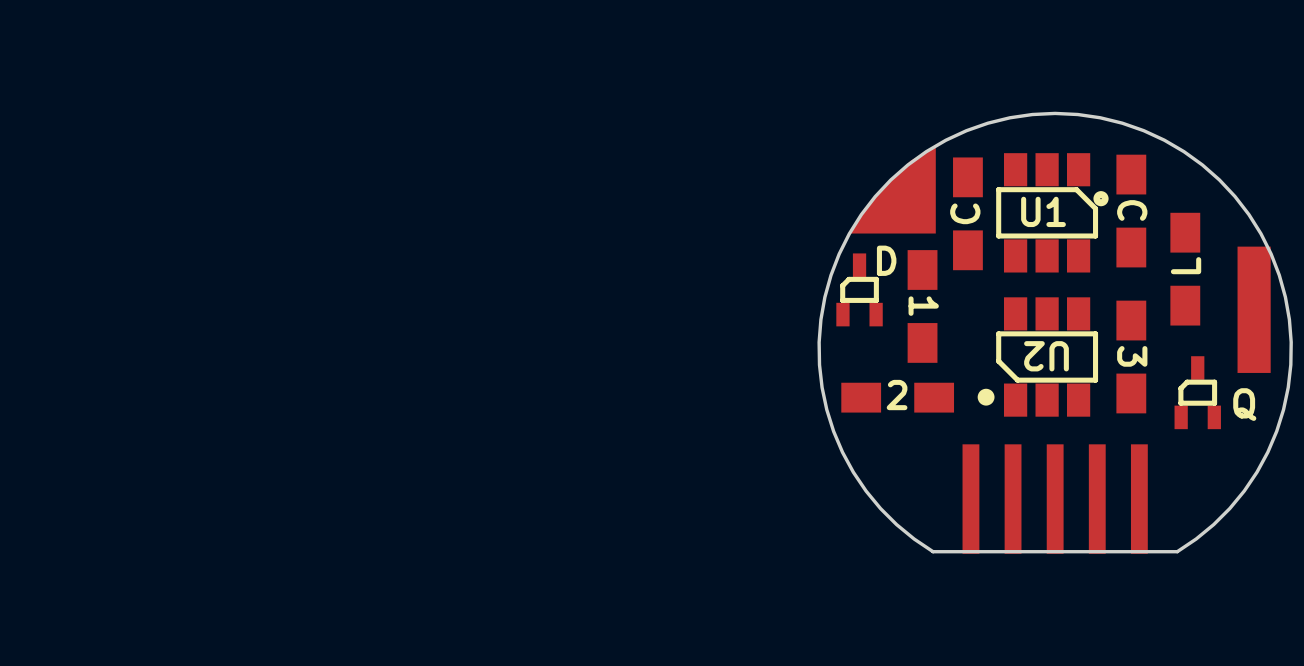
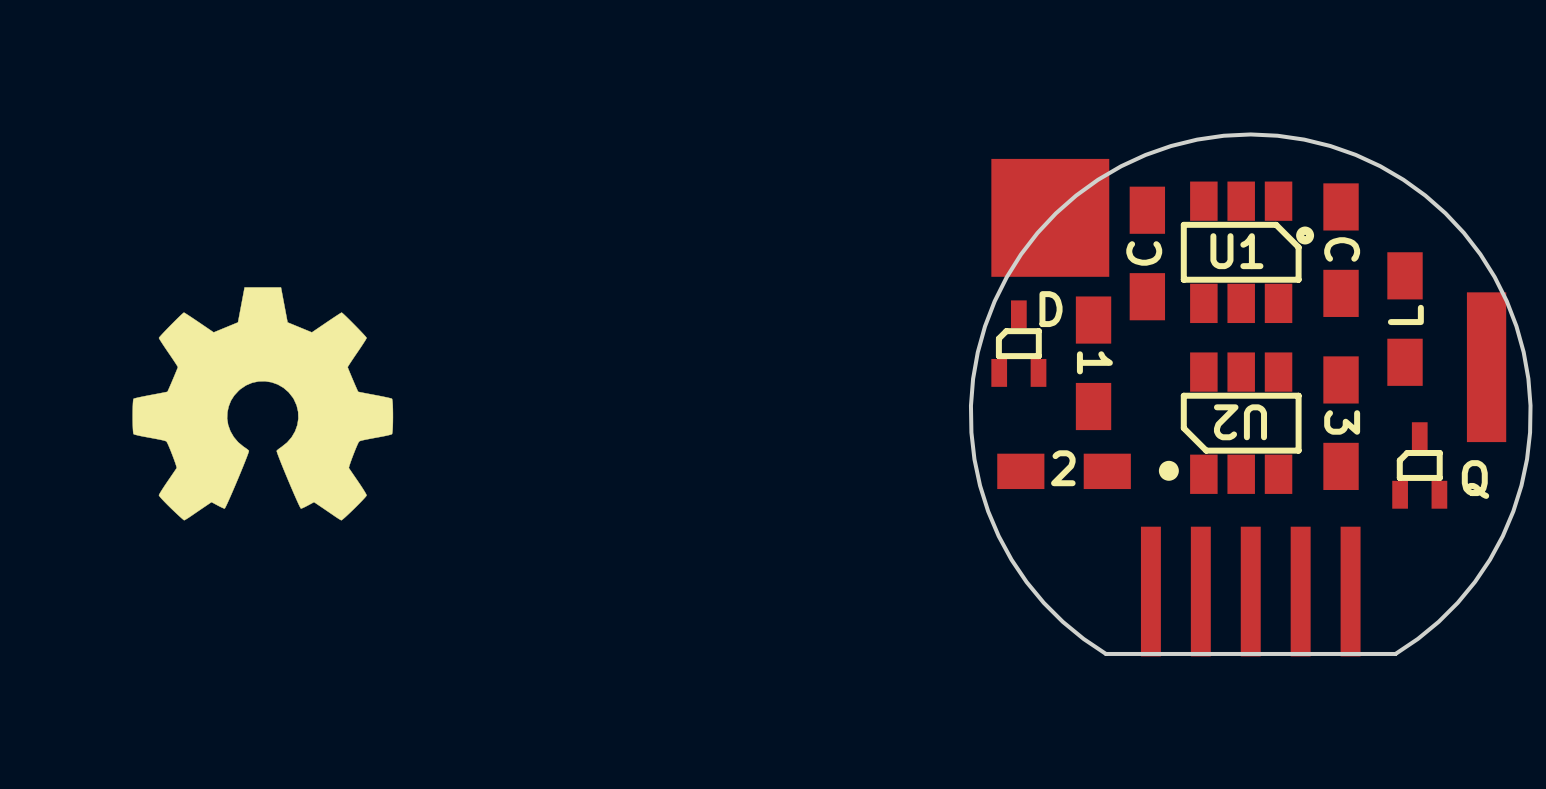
part footprint: [849, 145, 936, 234] -> [991, 158, 1110, 277]
drawing: none -> [132, 287, 394, 521]

